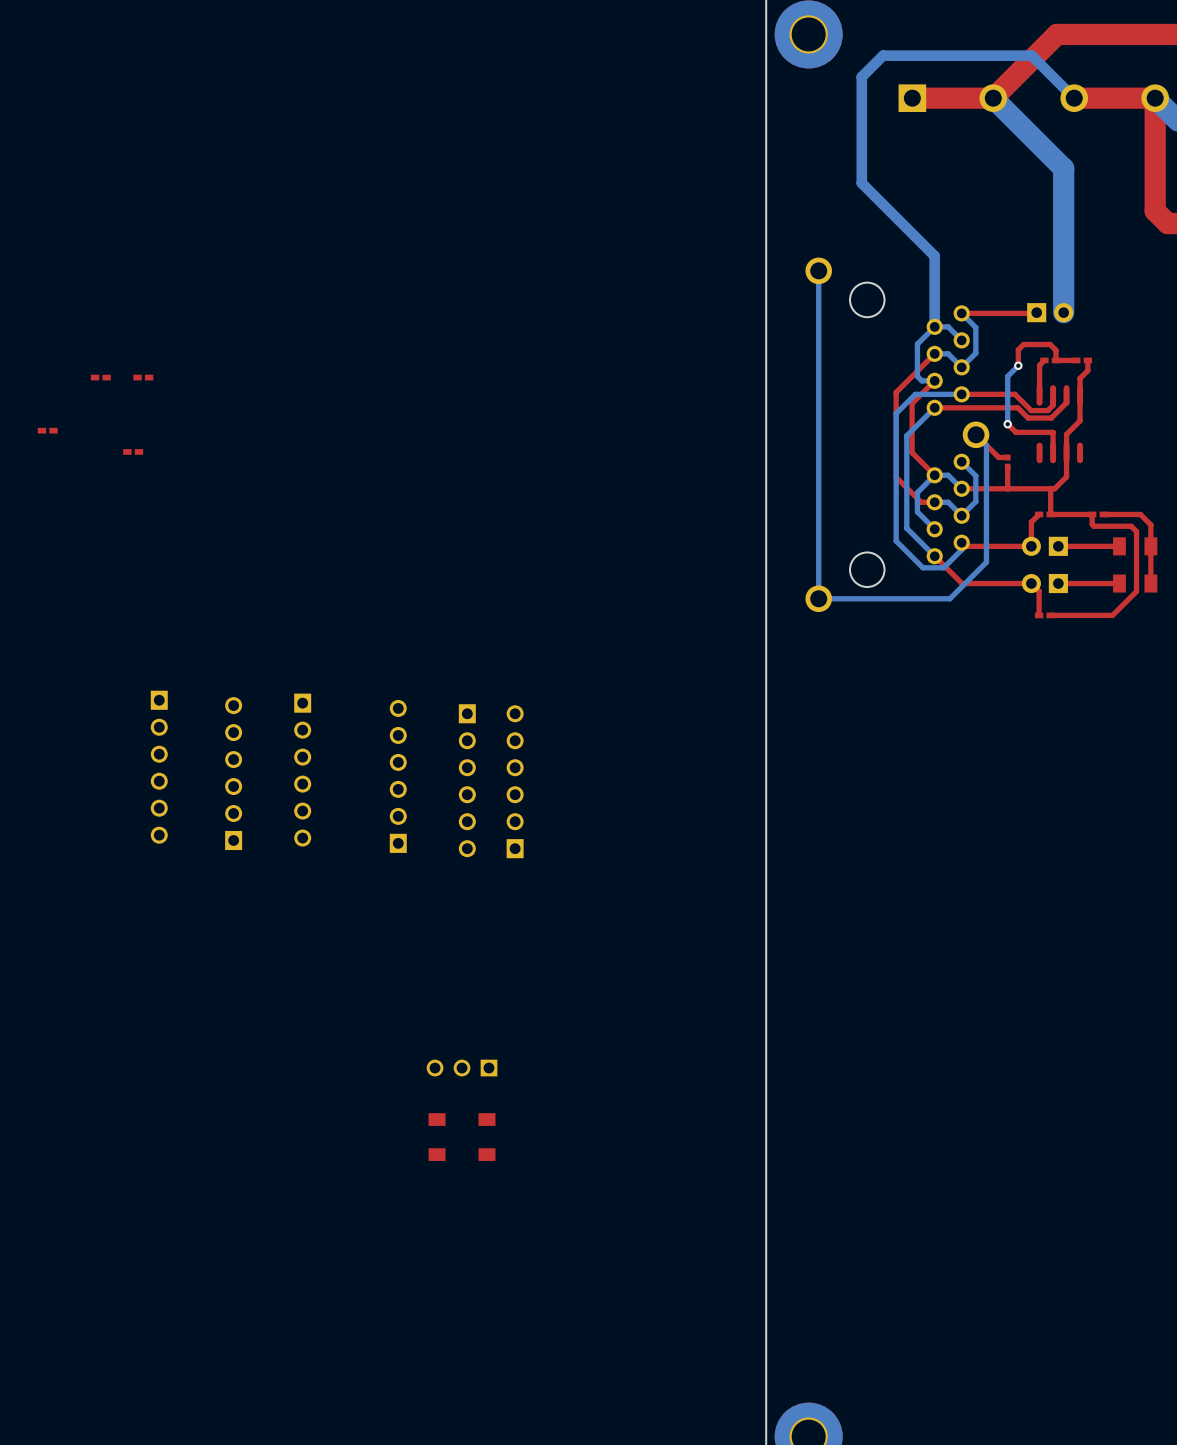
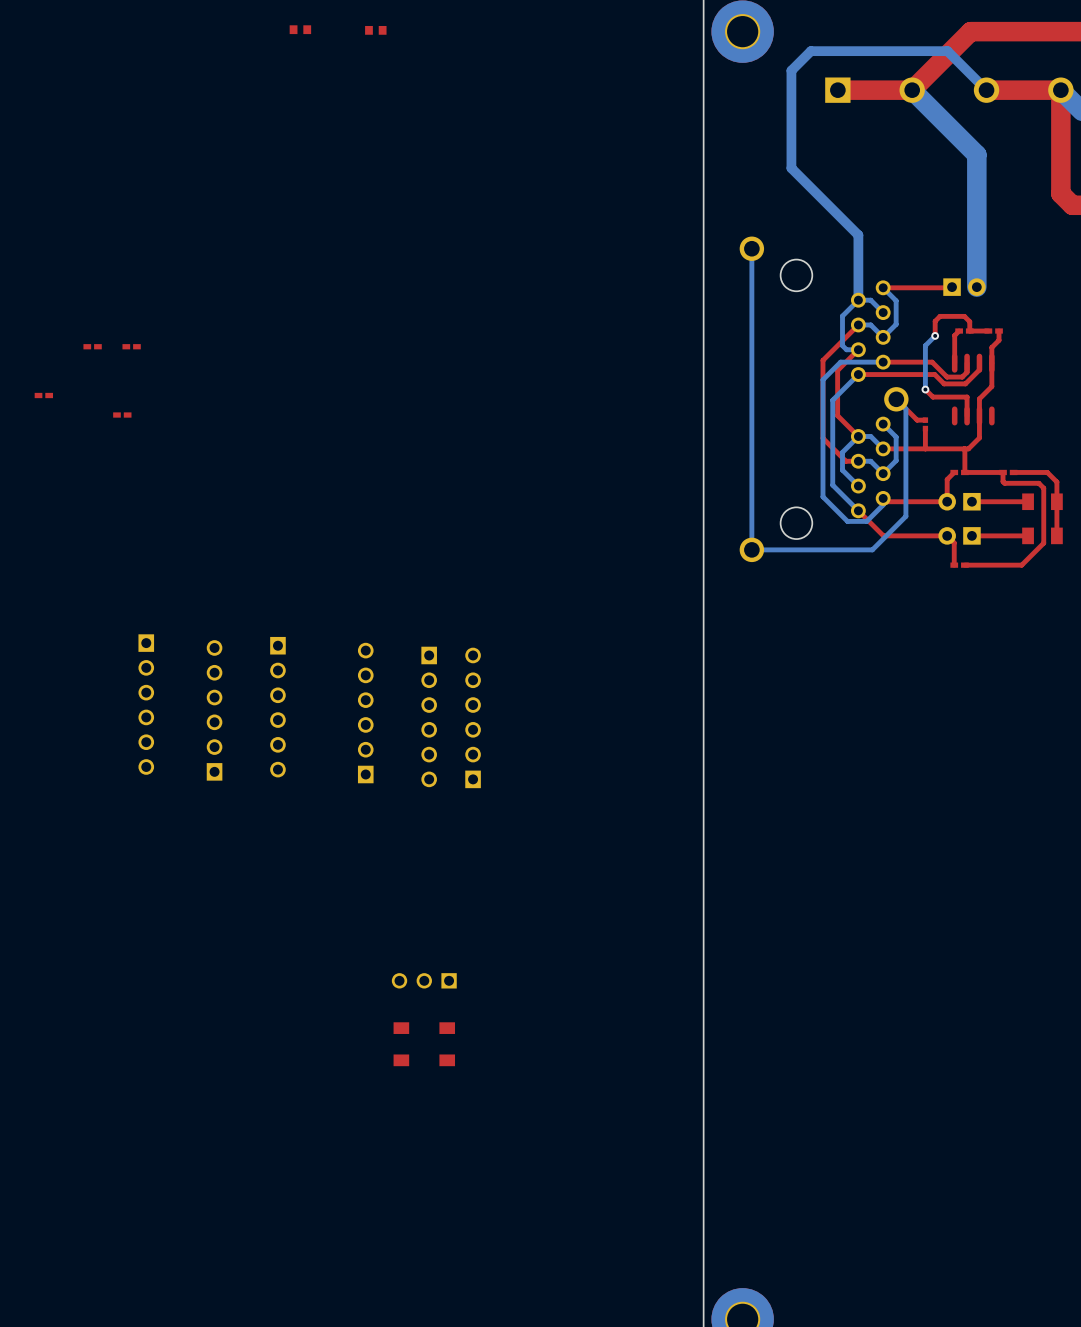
part: none -> (300, 29)
part: none -> (375, 30)

